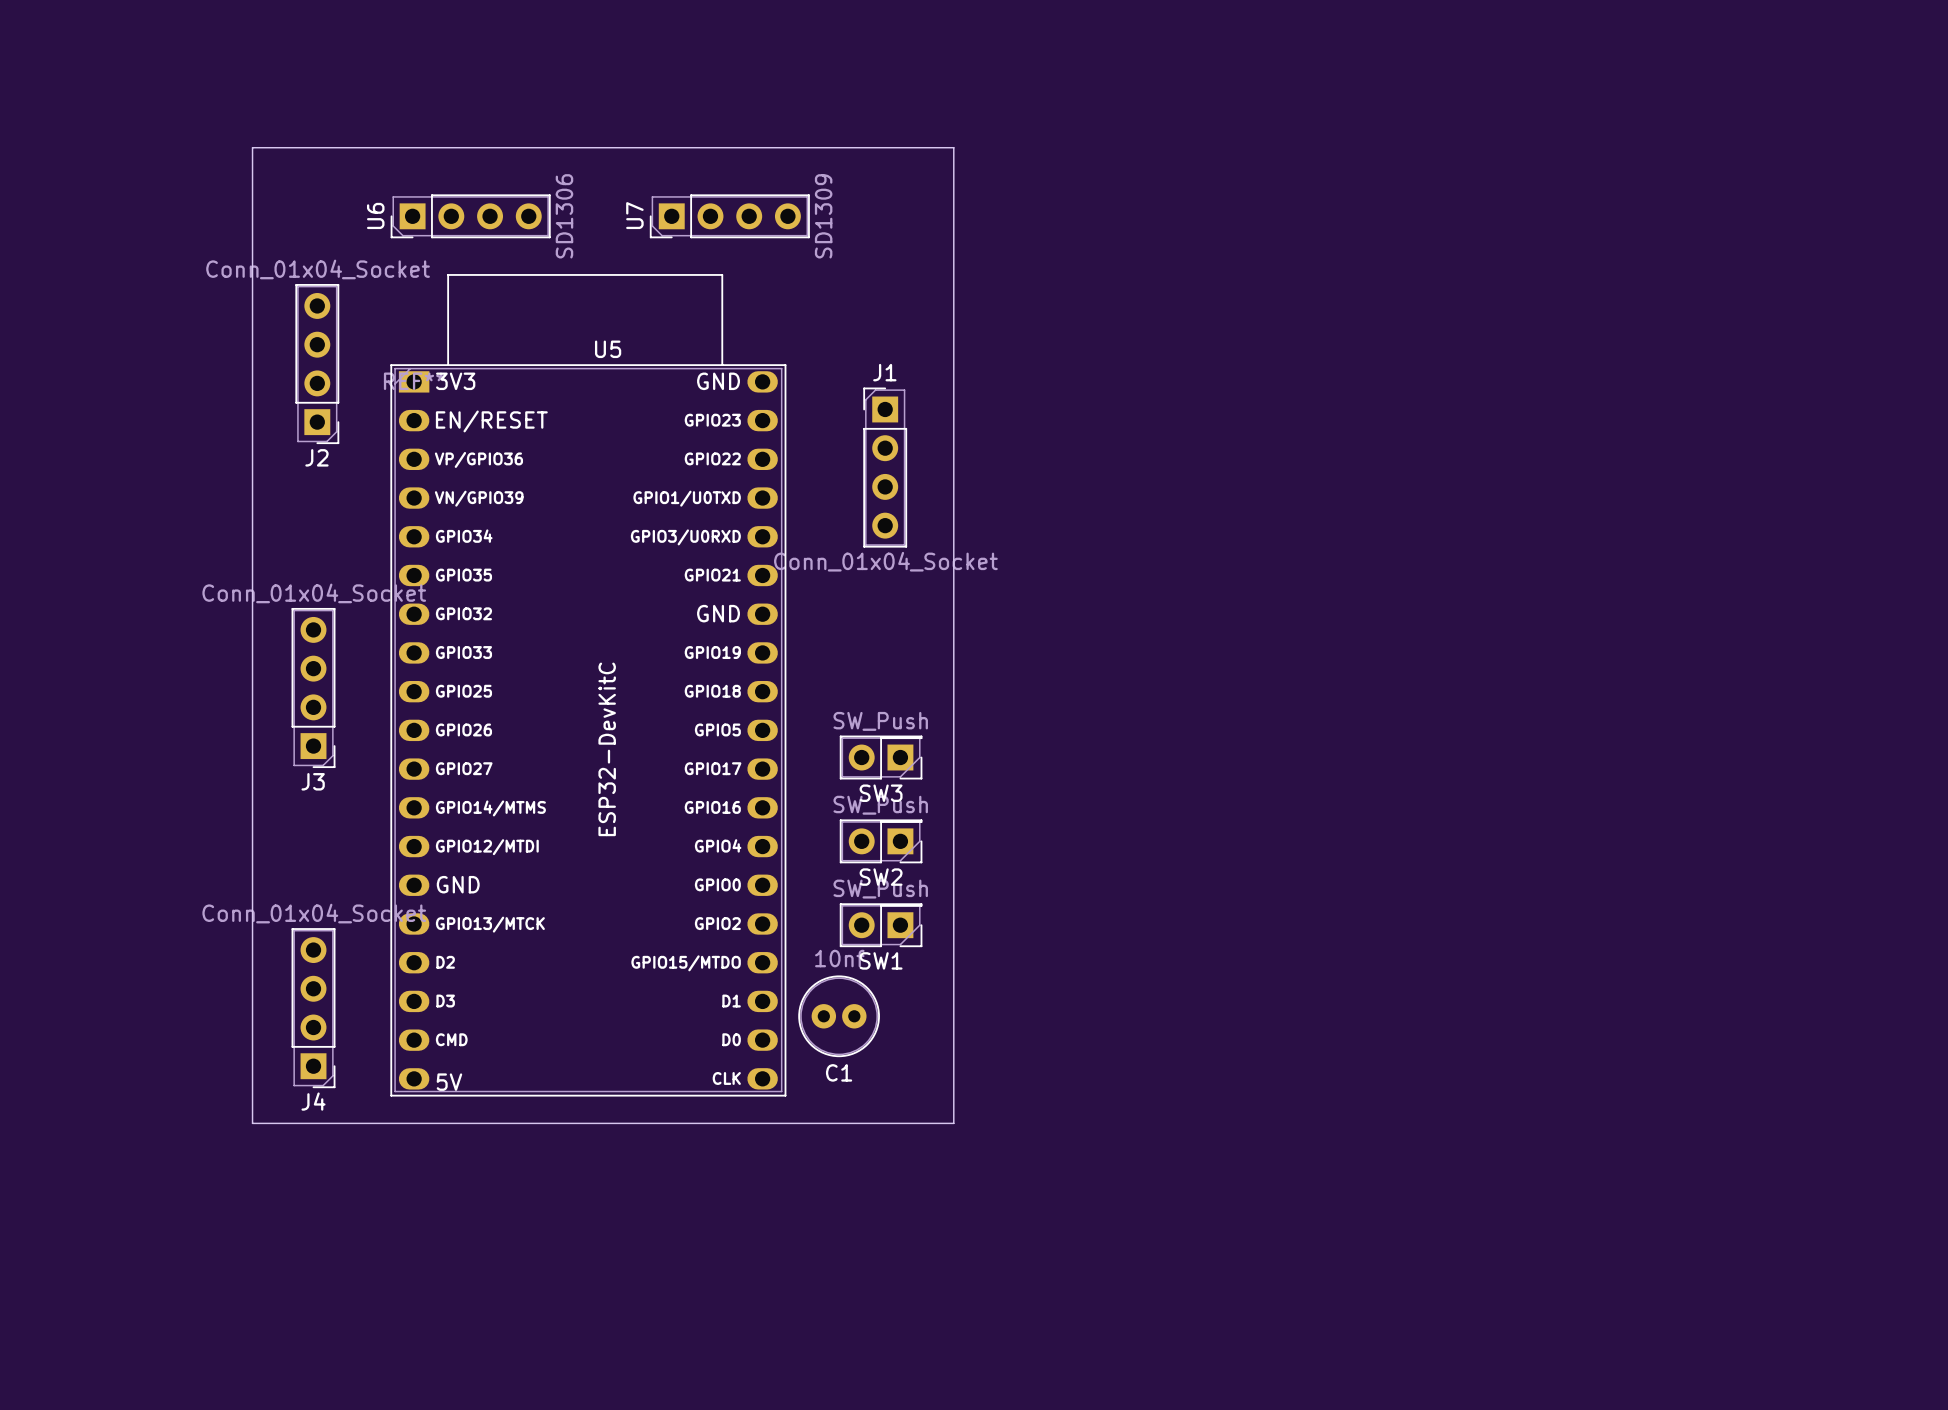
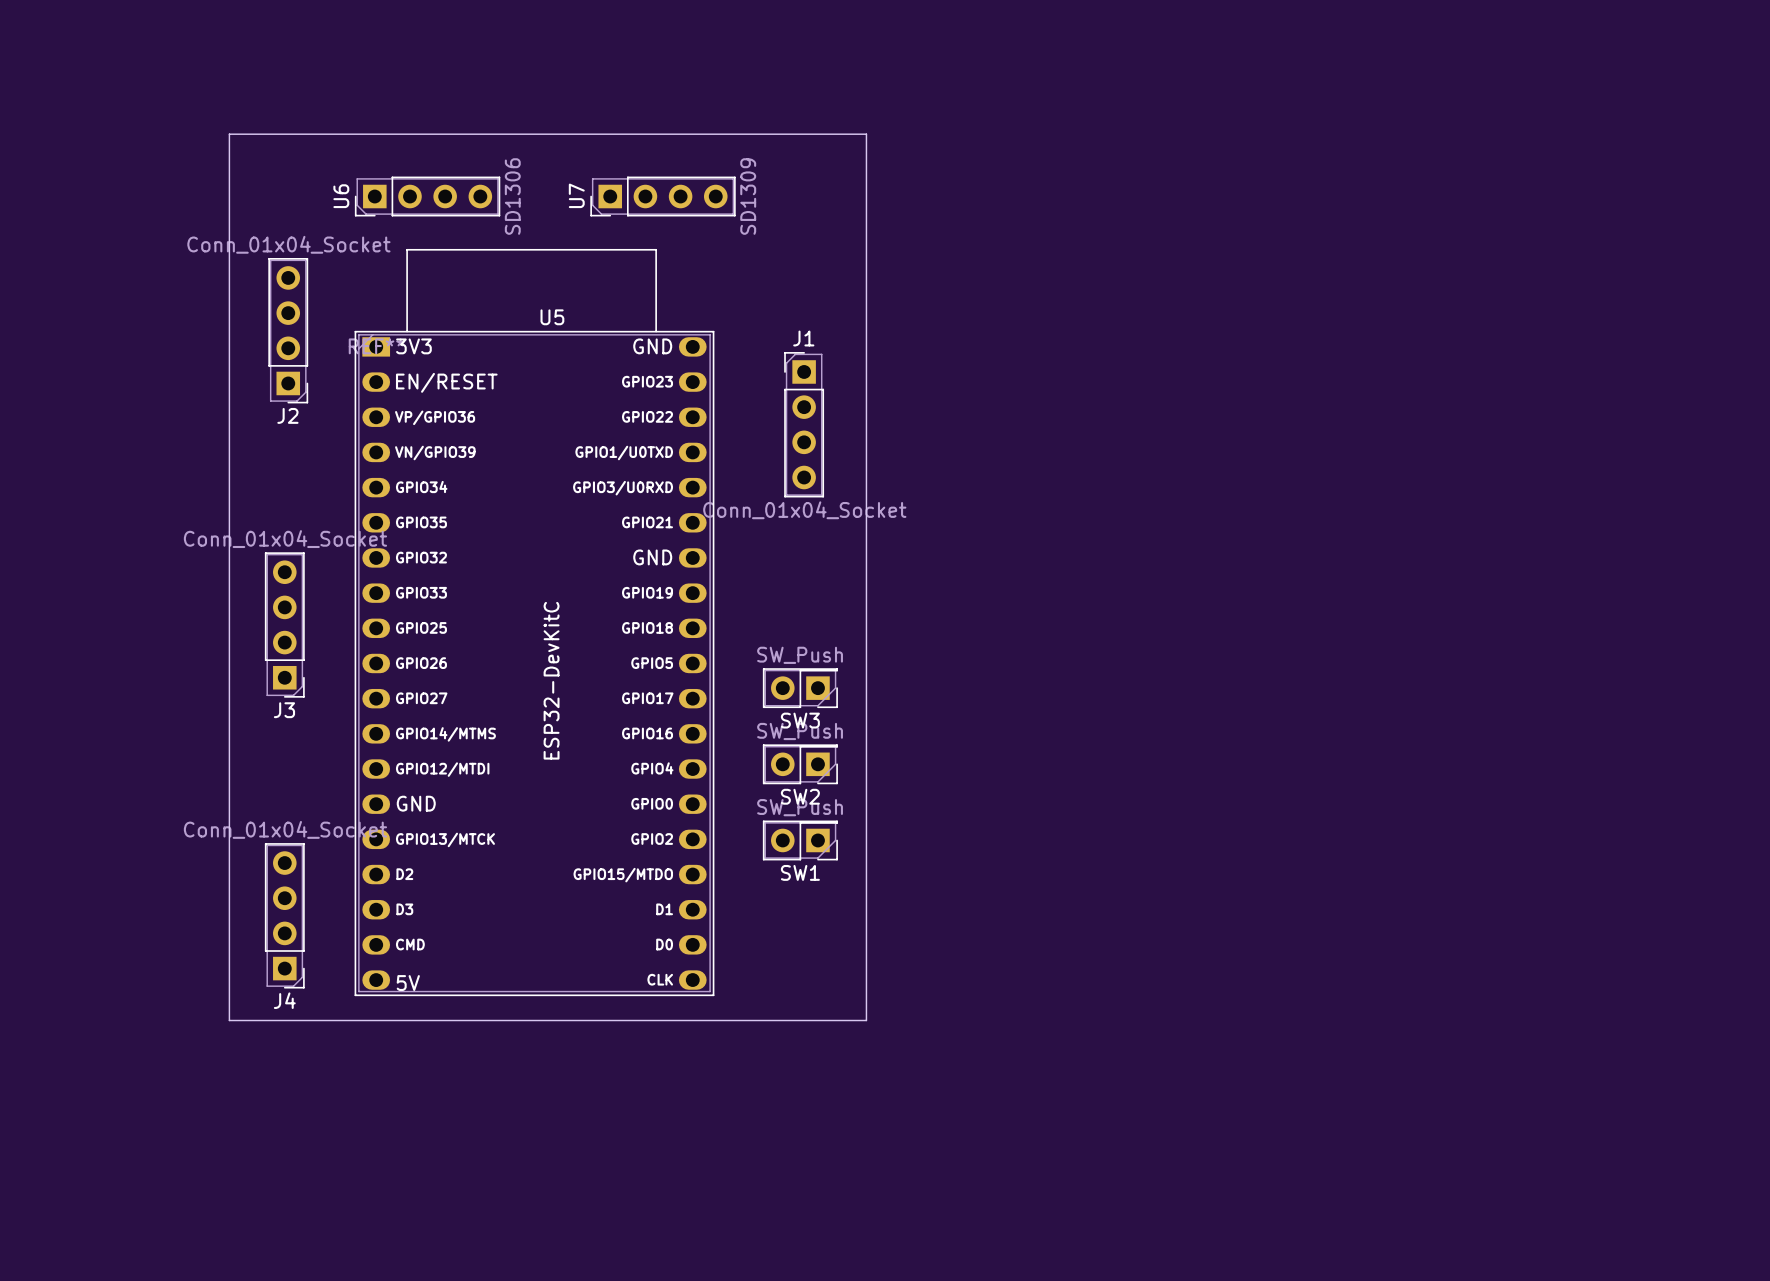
C1: 10nf (839, 1016) -> none

